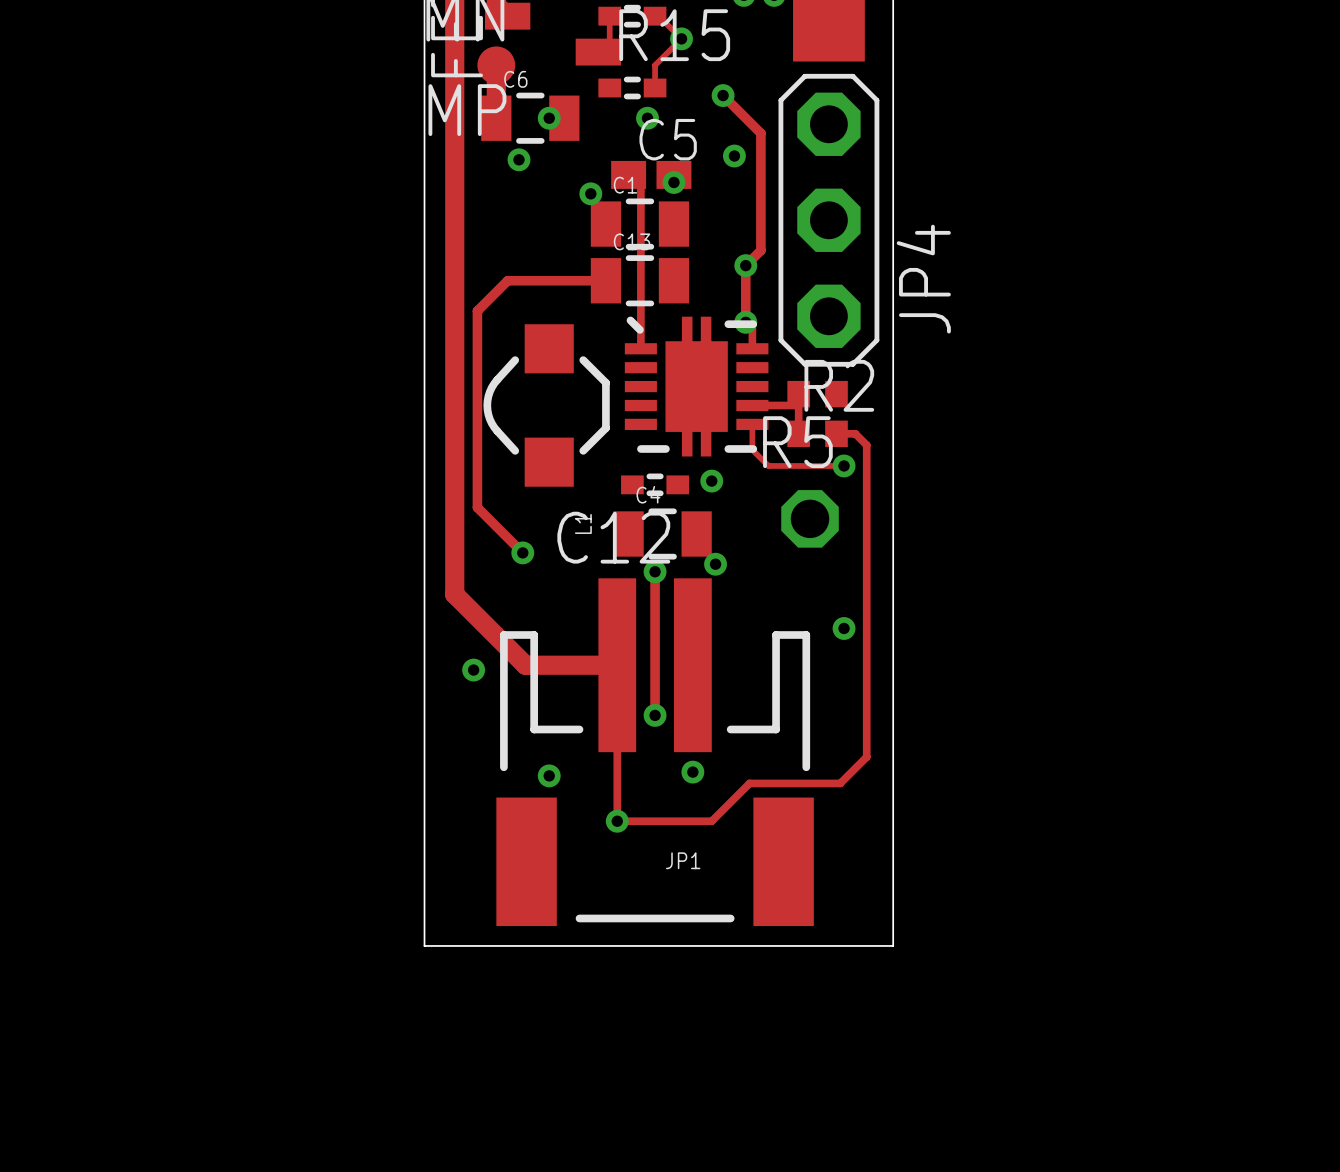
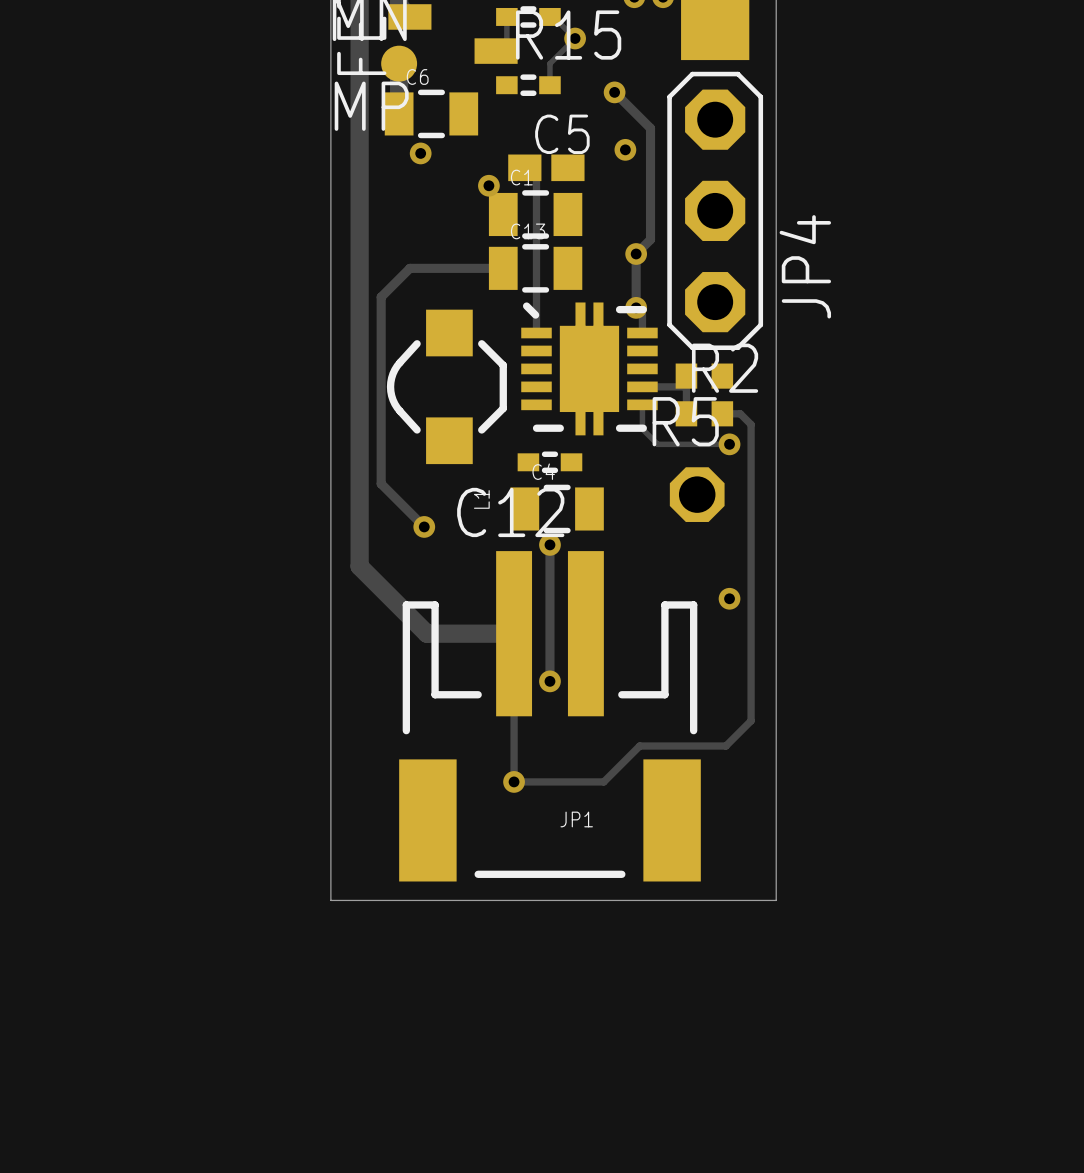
via: (549, 118) -> none
via: (647, 118) -> none
via: (673, 182) -> none
via: (711, 481) -> none
via: (715, 564) -> none
via: (473, 670) -> none
via: (692, 772) -> none
via: (549, 775) -> none

